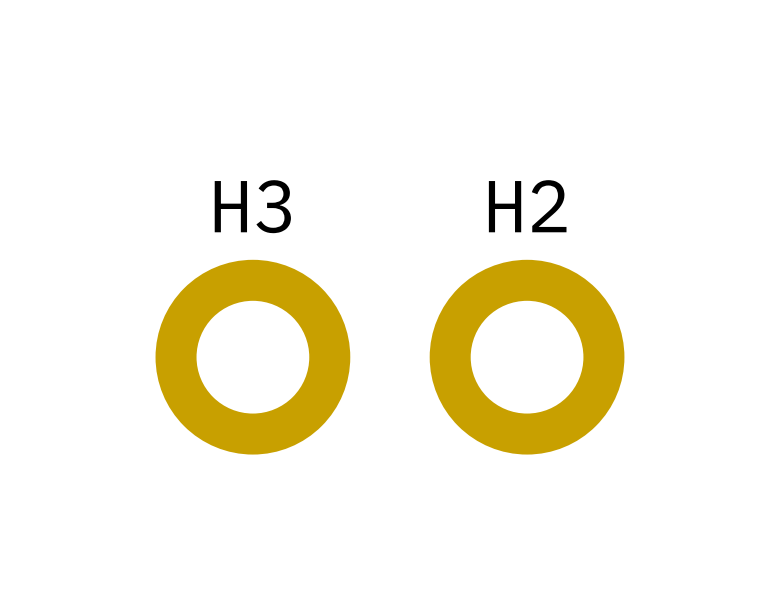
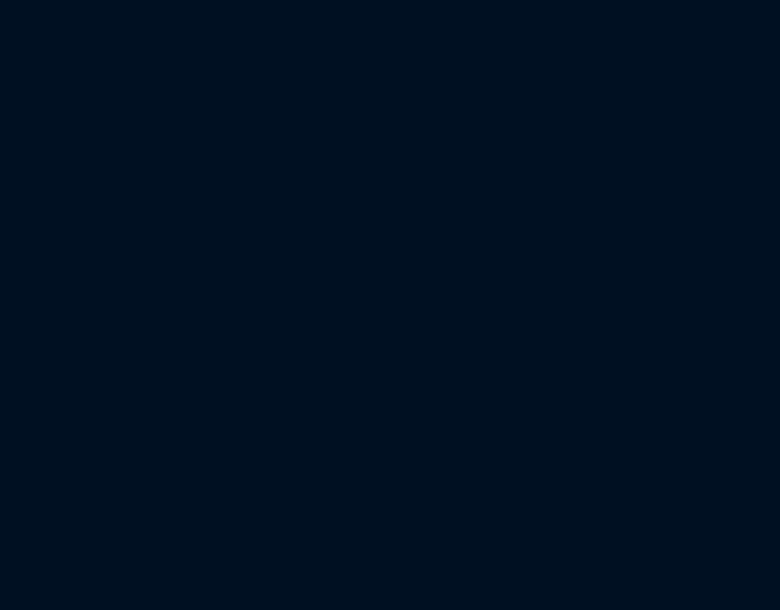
H3: (252, 357) -> none
H2: (527, 357) -> none

